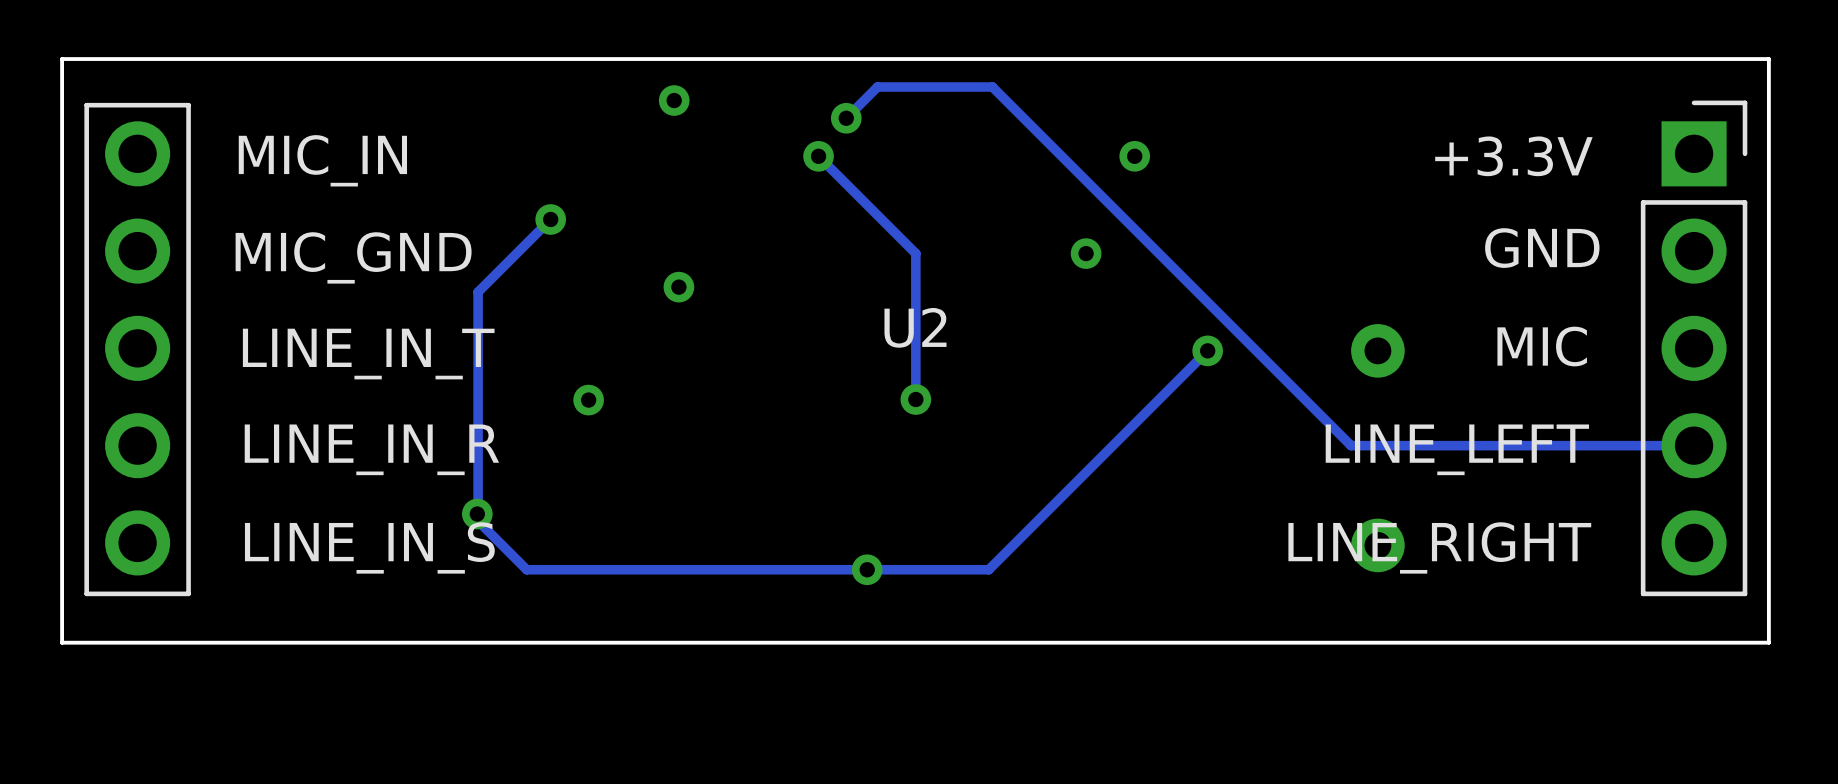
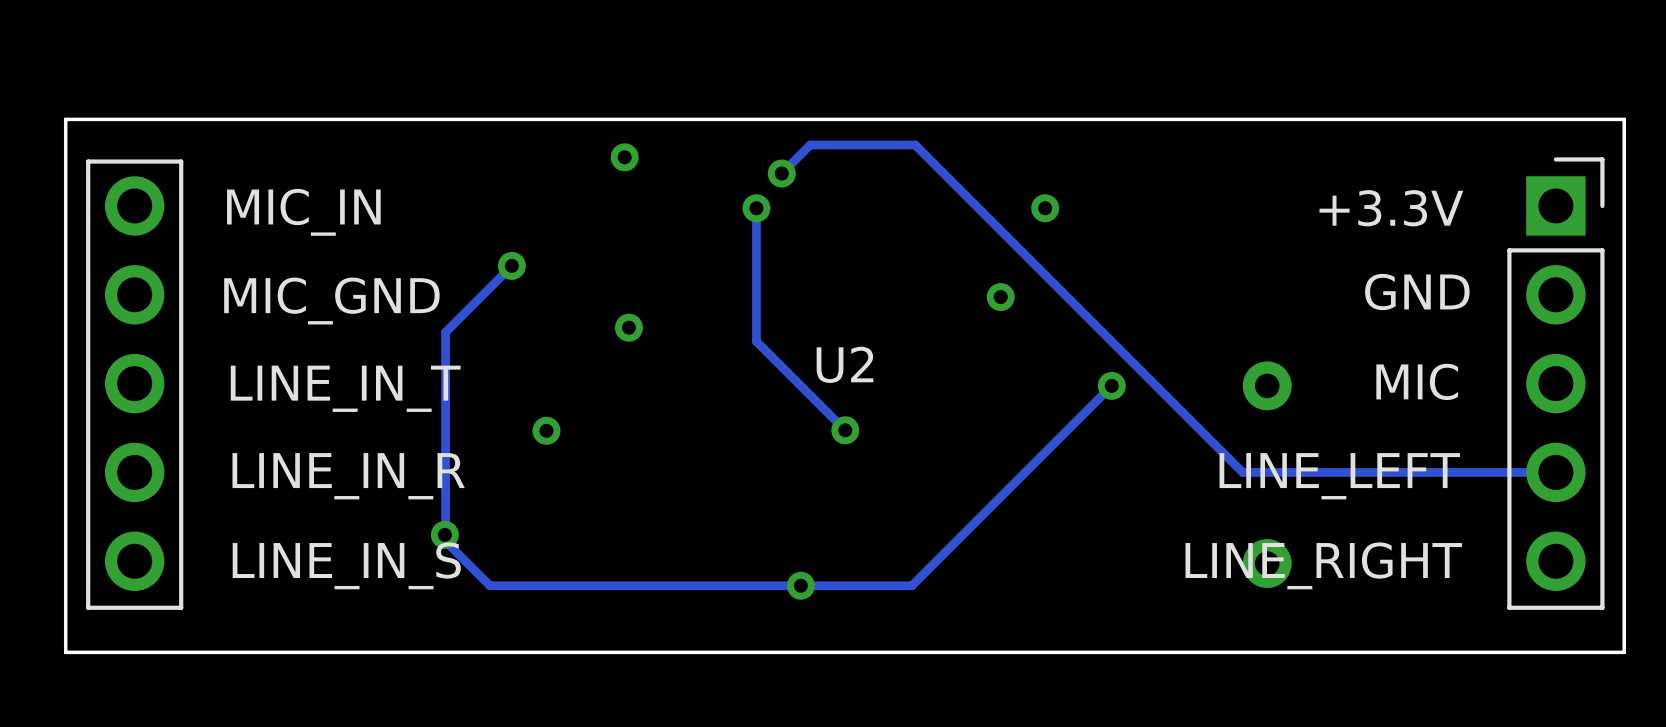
track: (818, 156) (915, 253) (915, 399) -> (756, 206) (756, 341) (845, 430)

